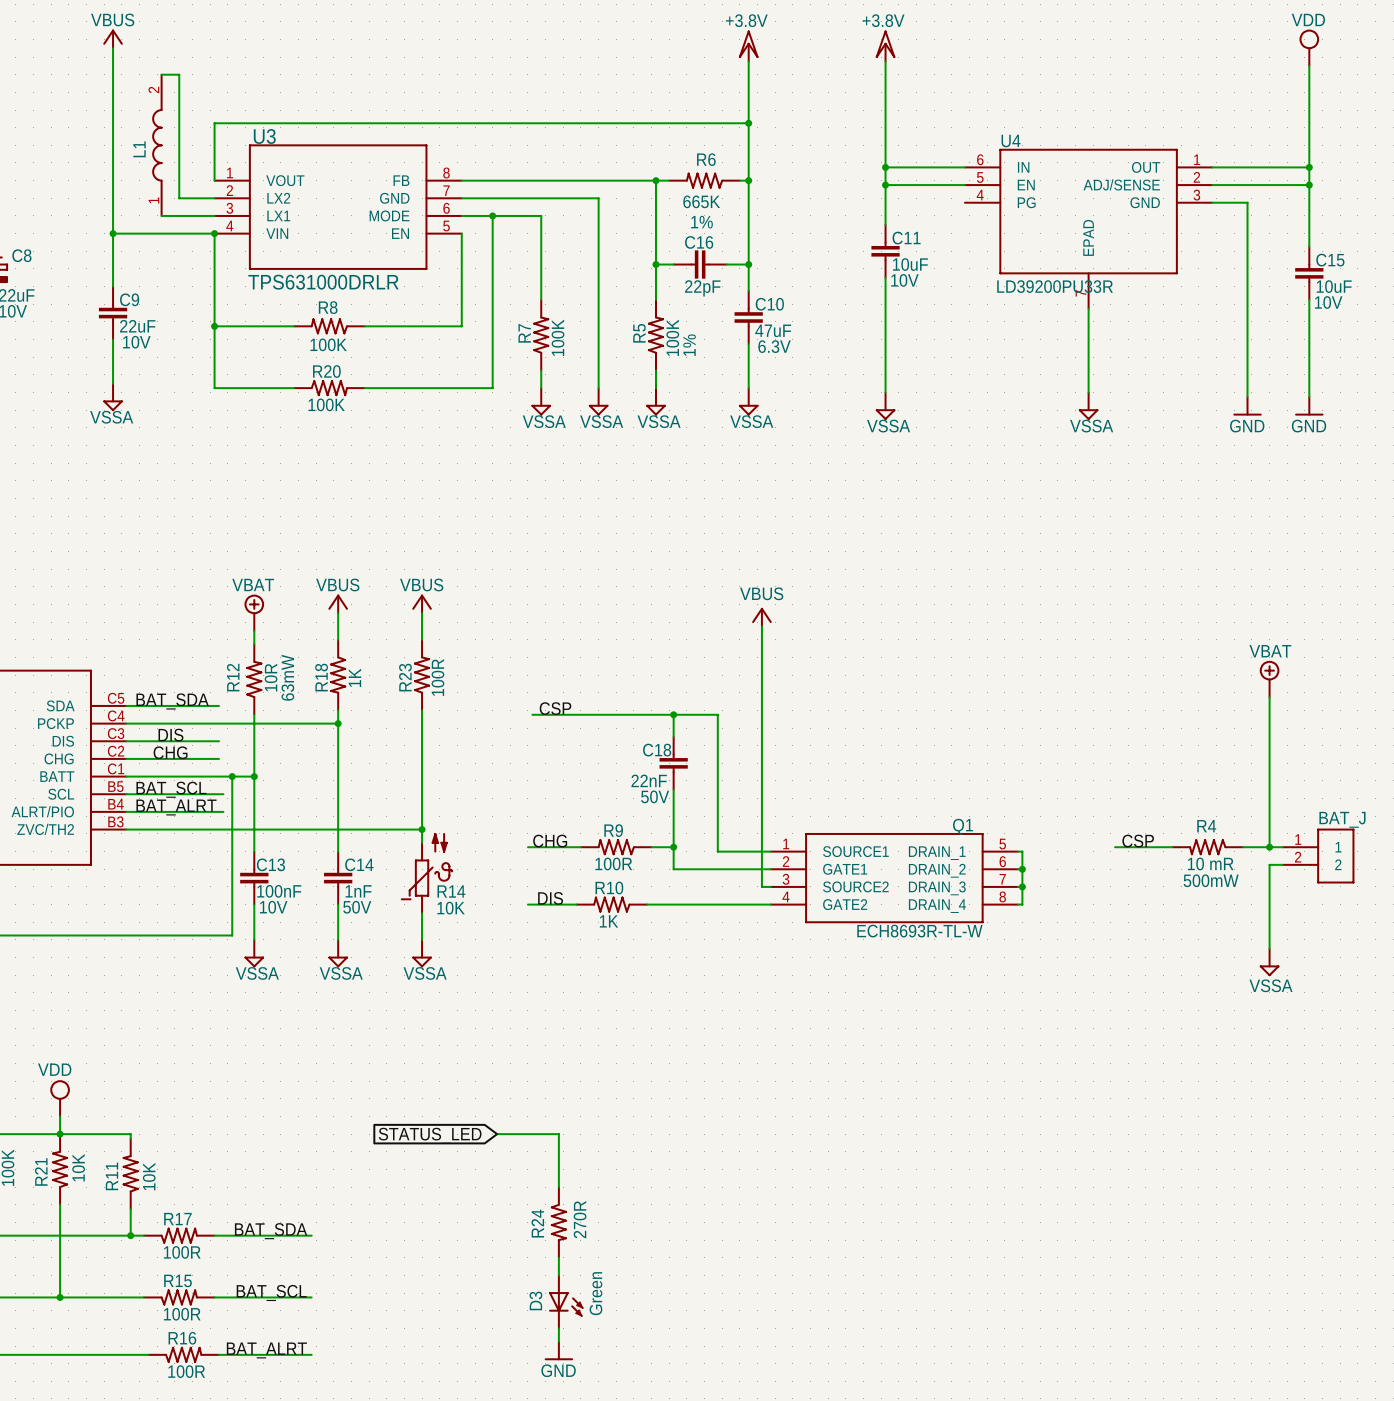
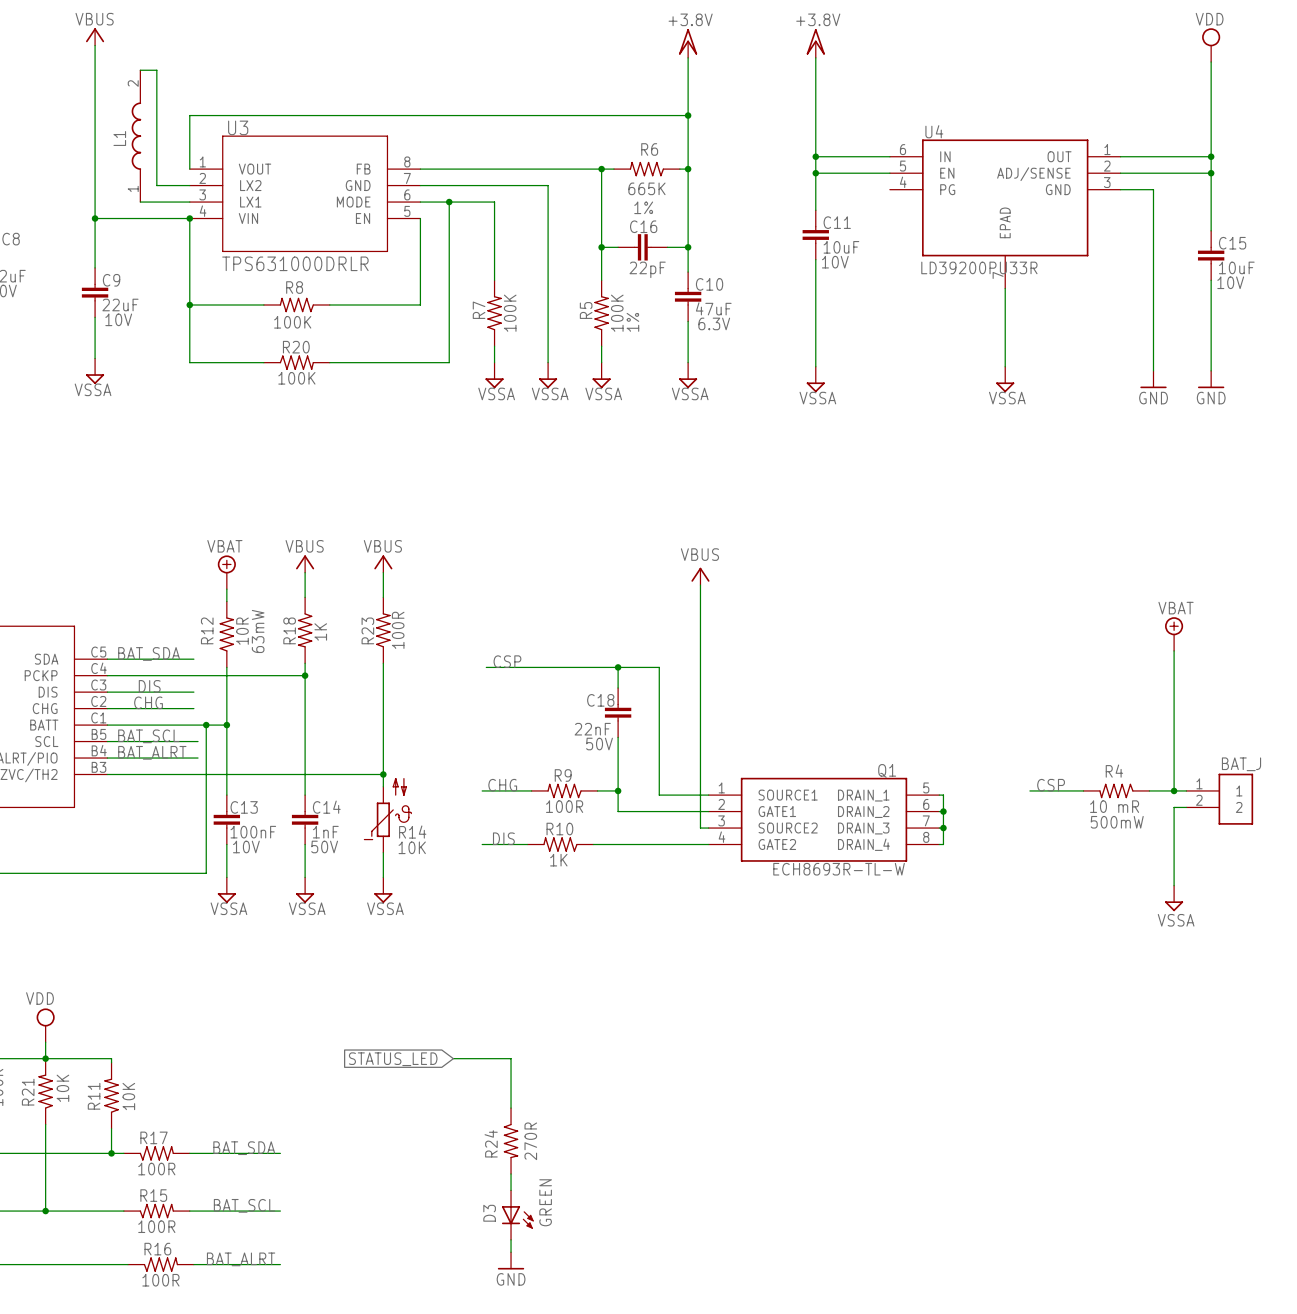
D3 value: Green (595, 1293) -> GREEN (545, 1202)

